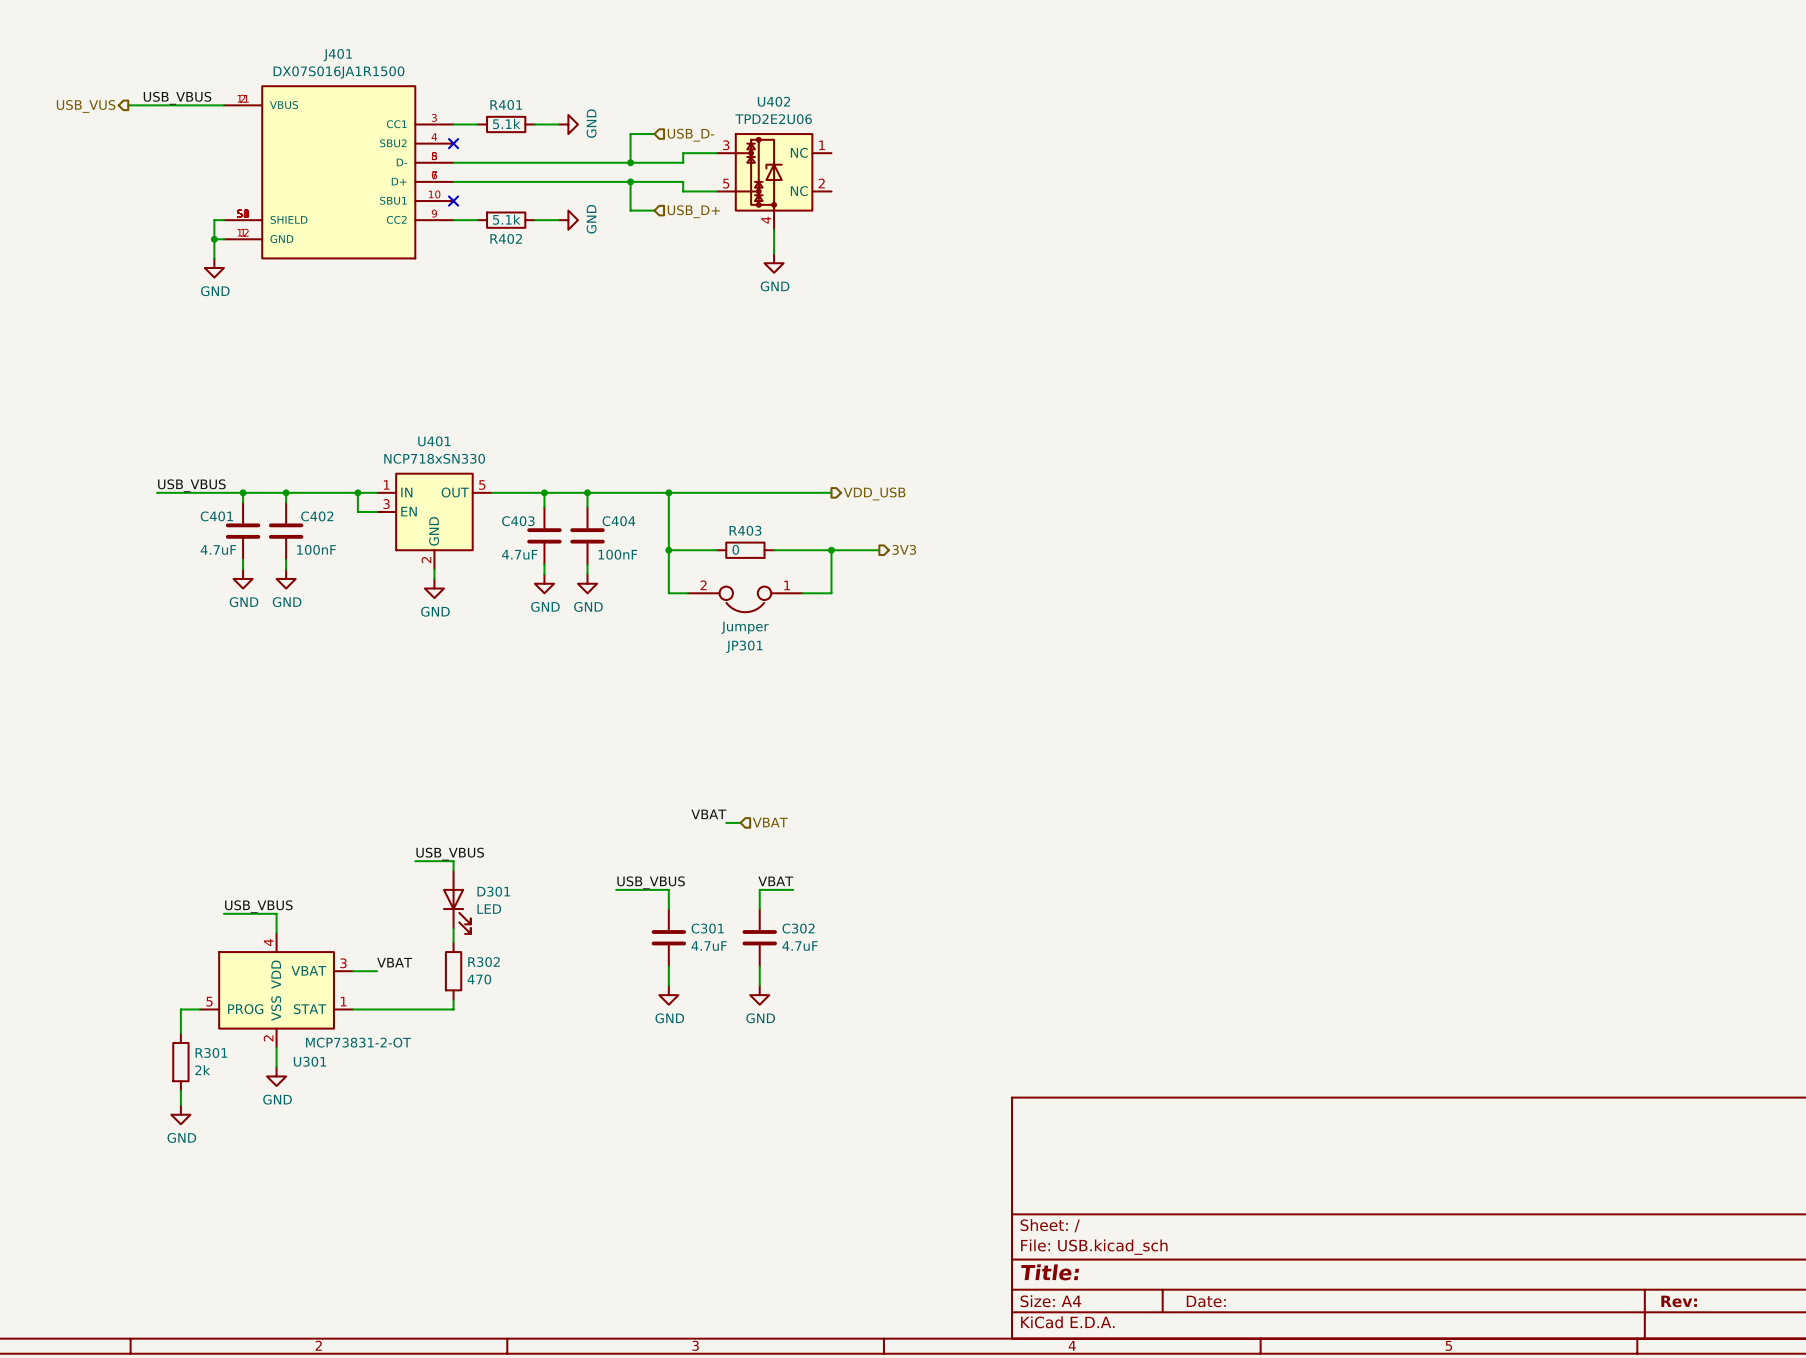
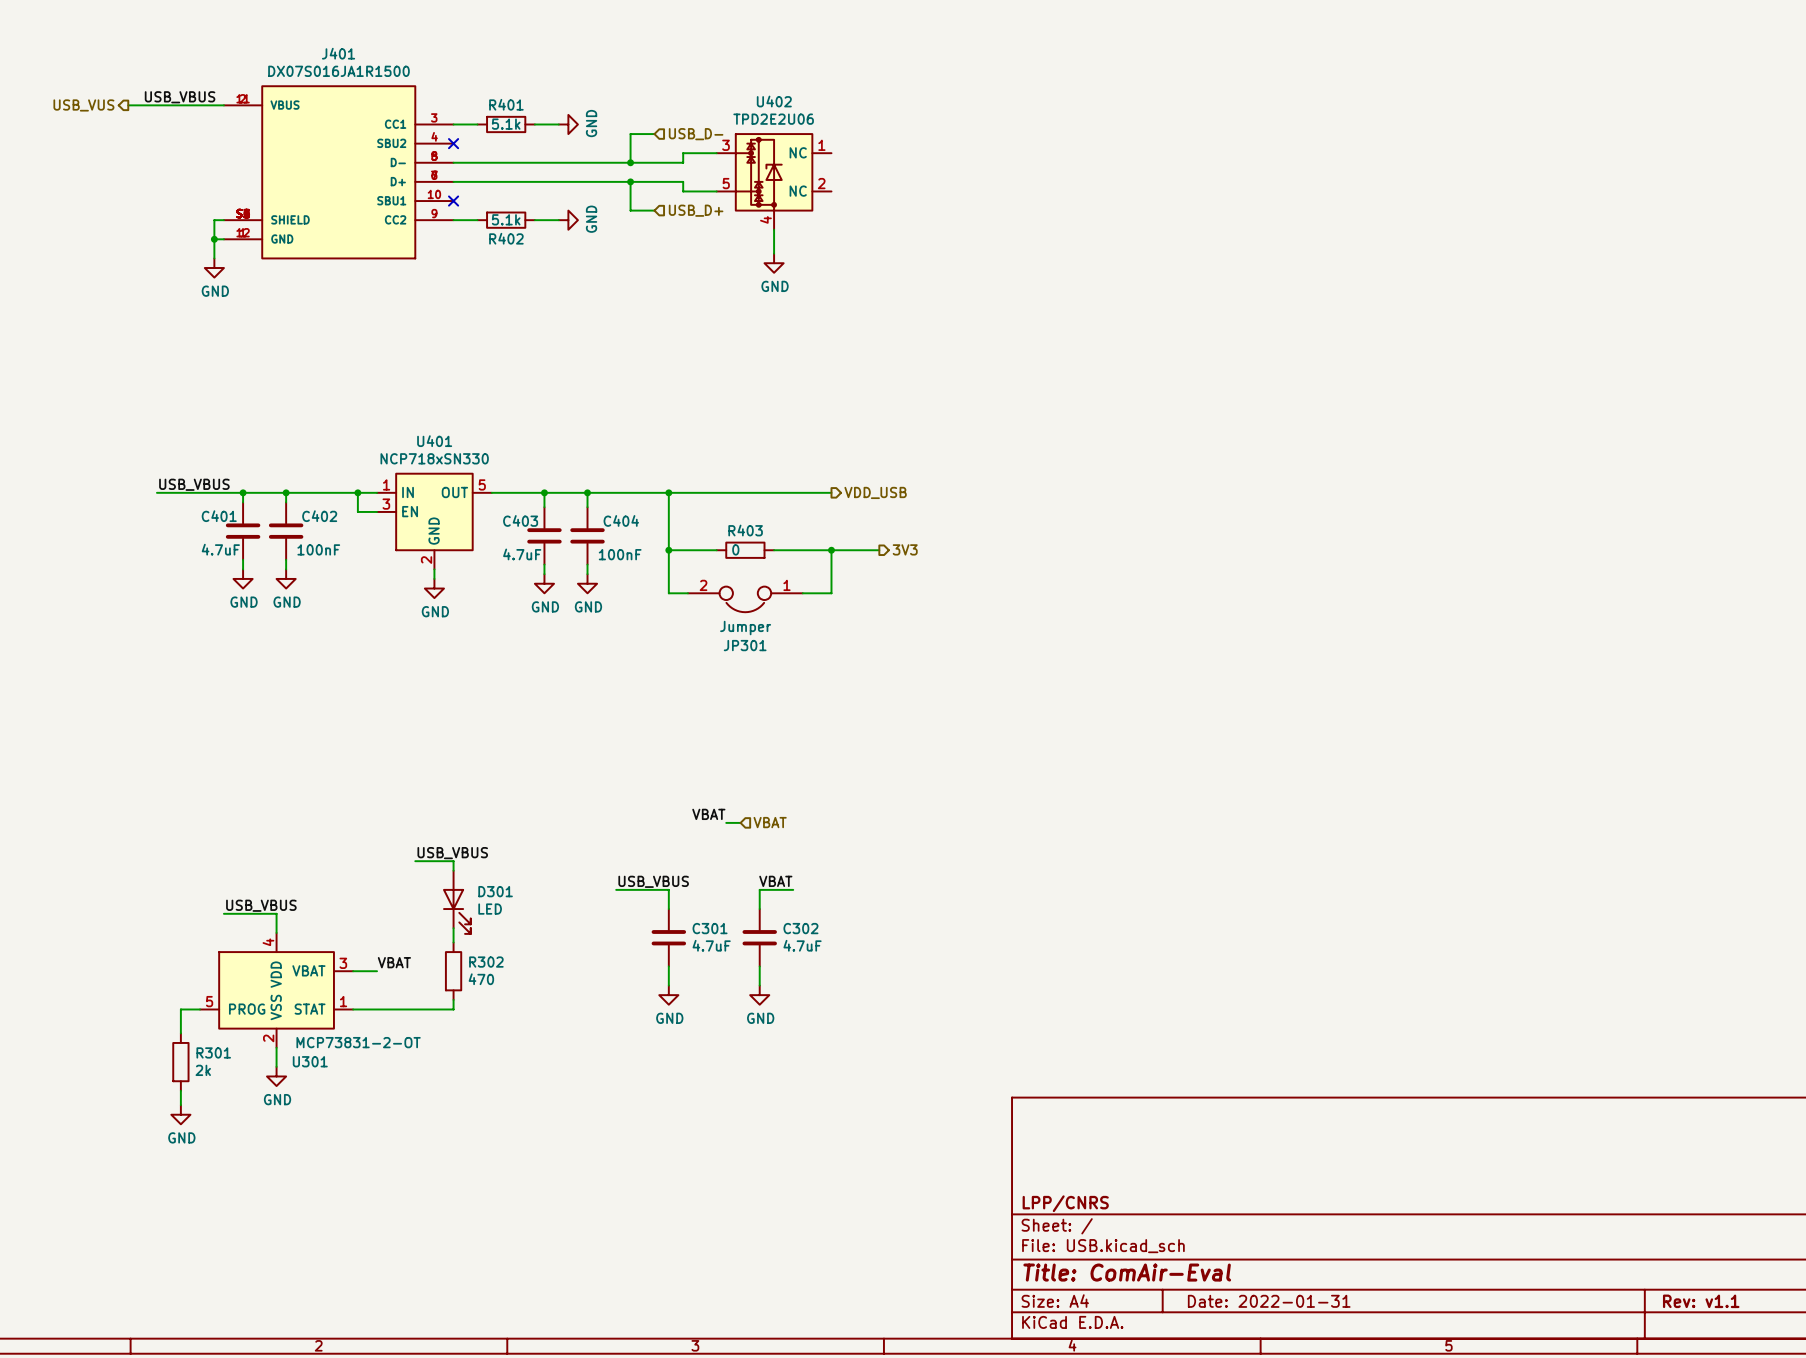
title block: none -> LPP/CNRS (1065, 1203)
title block: Title: (1050, 1272) -> Title: ComAir-Eval (1127, 1272)
title block: Date: (1206, 1301) -> Date: 2022-01-31 (1269, 1301)
title block: Rev: (1679, 1301) -> Rev: v1.1 (1701, 1301)

